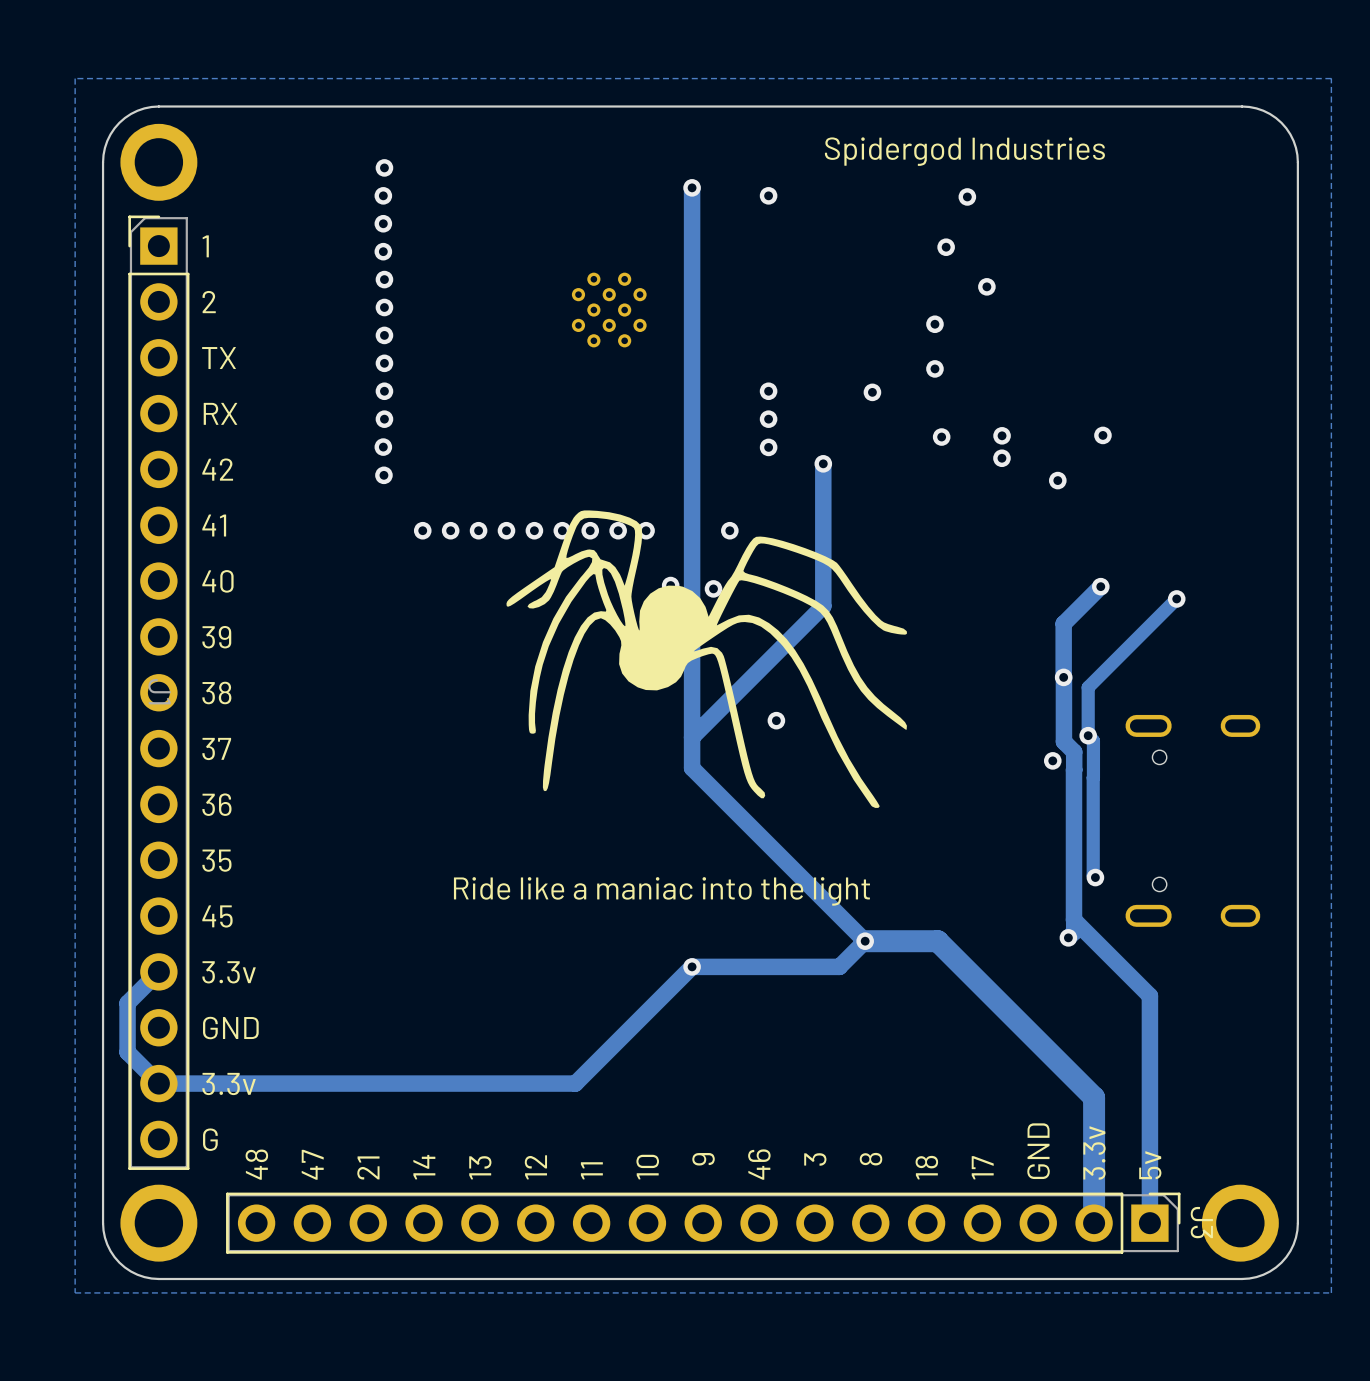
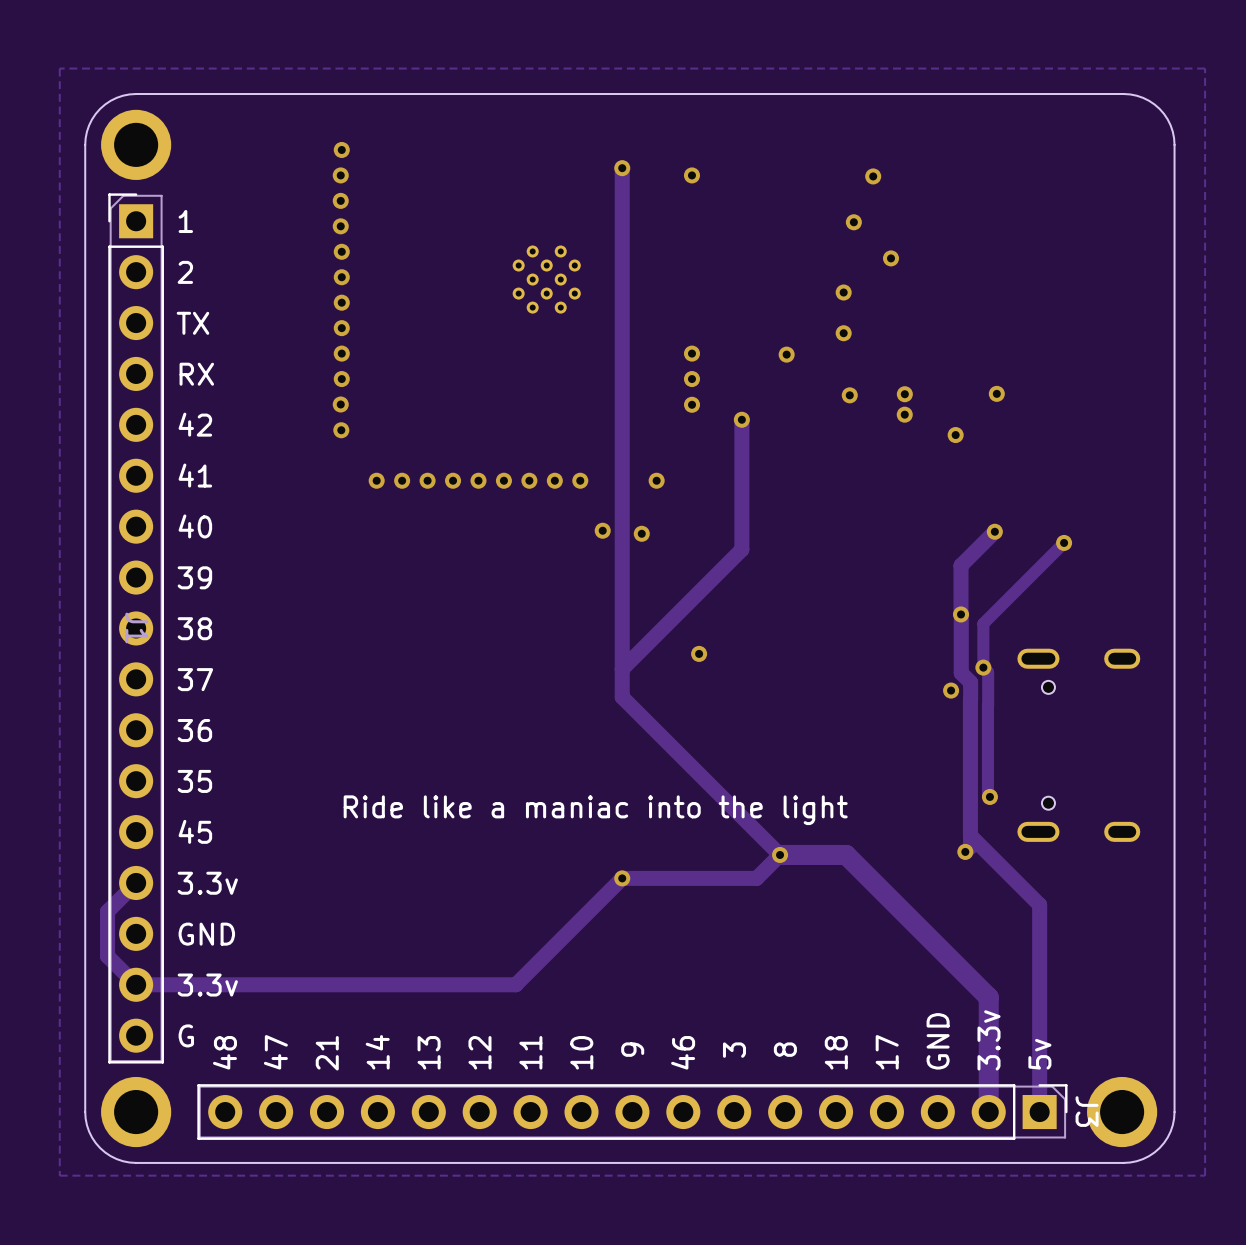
text: Spidergod Industries (964, 151) -> none
drawing: [506, 510, 907, 808] -> none

